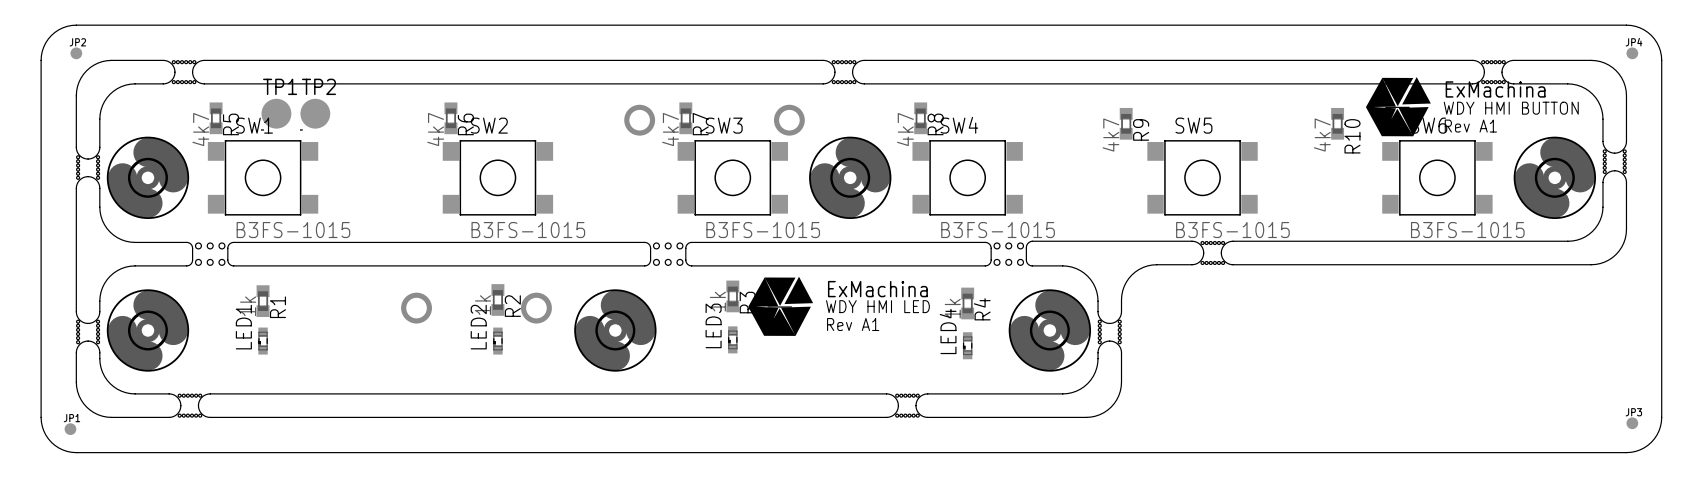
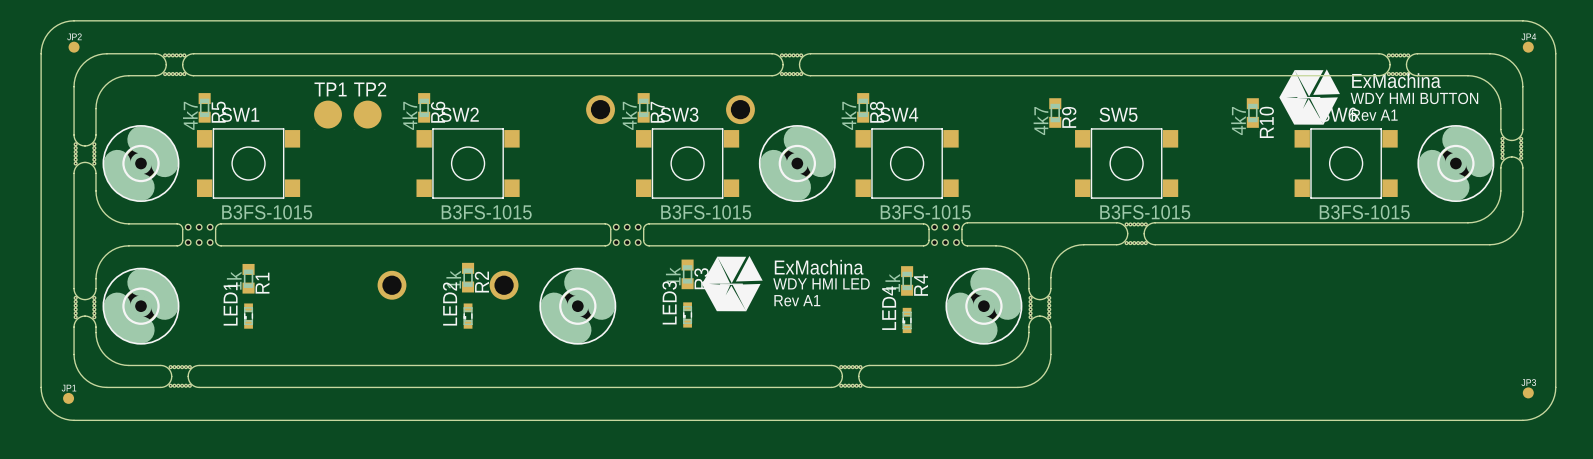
TP1 position: (276, 113) -> (328, 114)
TP2 position: (315, 113) -> (367, 114)

